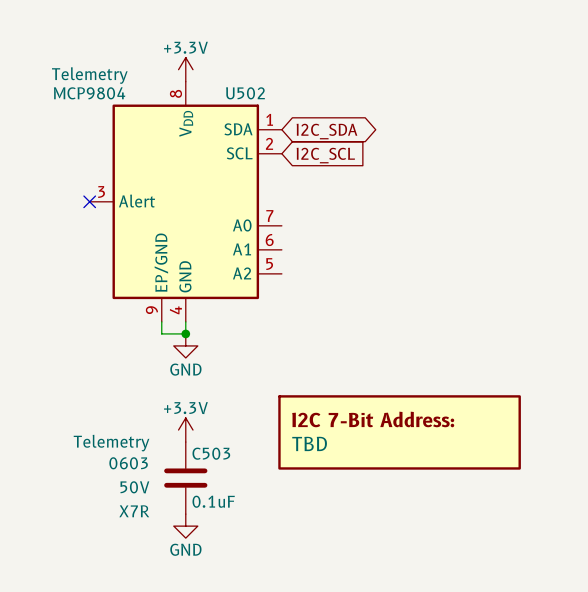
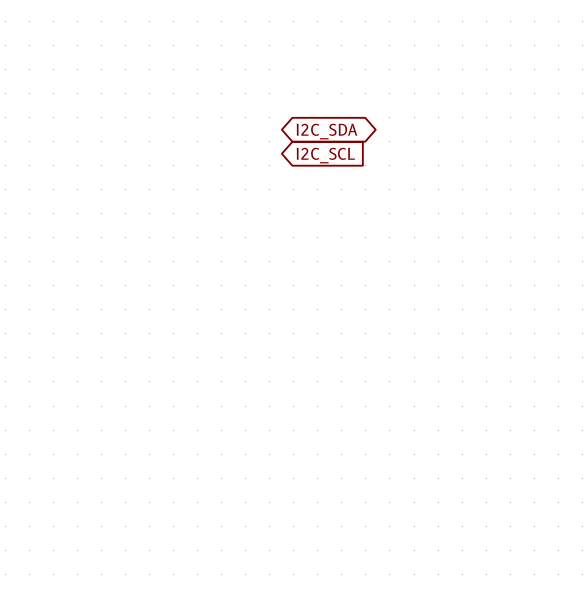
power symbol: +3.3V (185, 69) -> none
no-connect mark: (89, 201) -> none
U502: MCP9804 (185, 201) -> none
wire: (161, 321) (161, 333) (185, 333) (185, 321) -> none
junction: (185, 333) -> none
power symbol: GND (185, 345) -> none
power symbol: +3.3V (185, 430) -> none
part: TBD (399, 432) -> none
C503: 0.1uF (185, 478) -> none
power symbol: GND (185, 526) -> none

